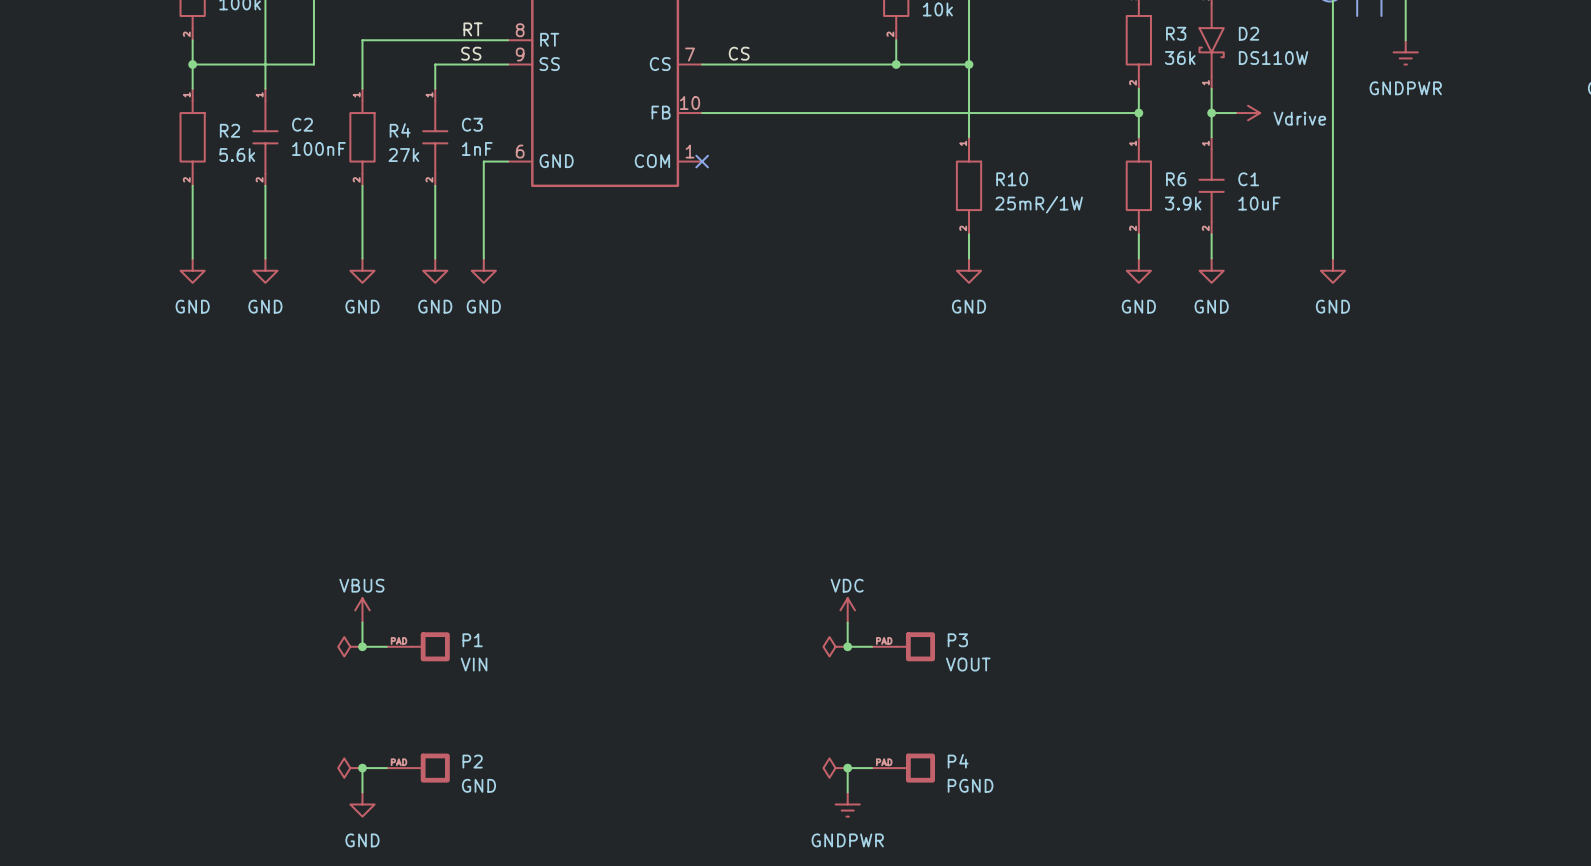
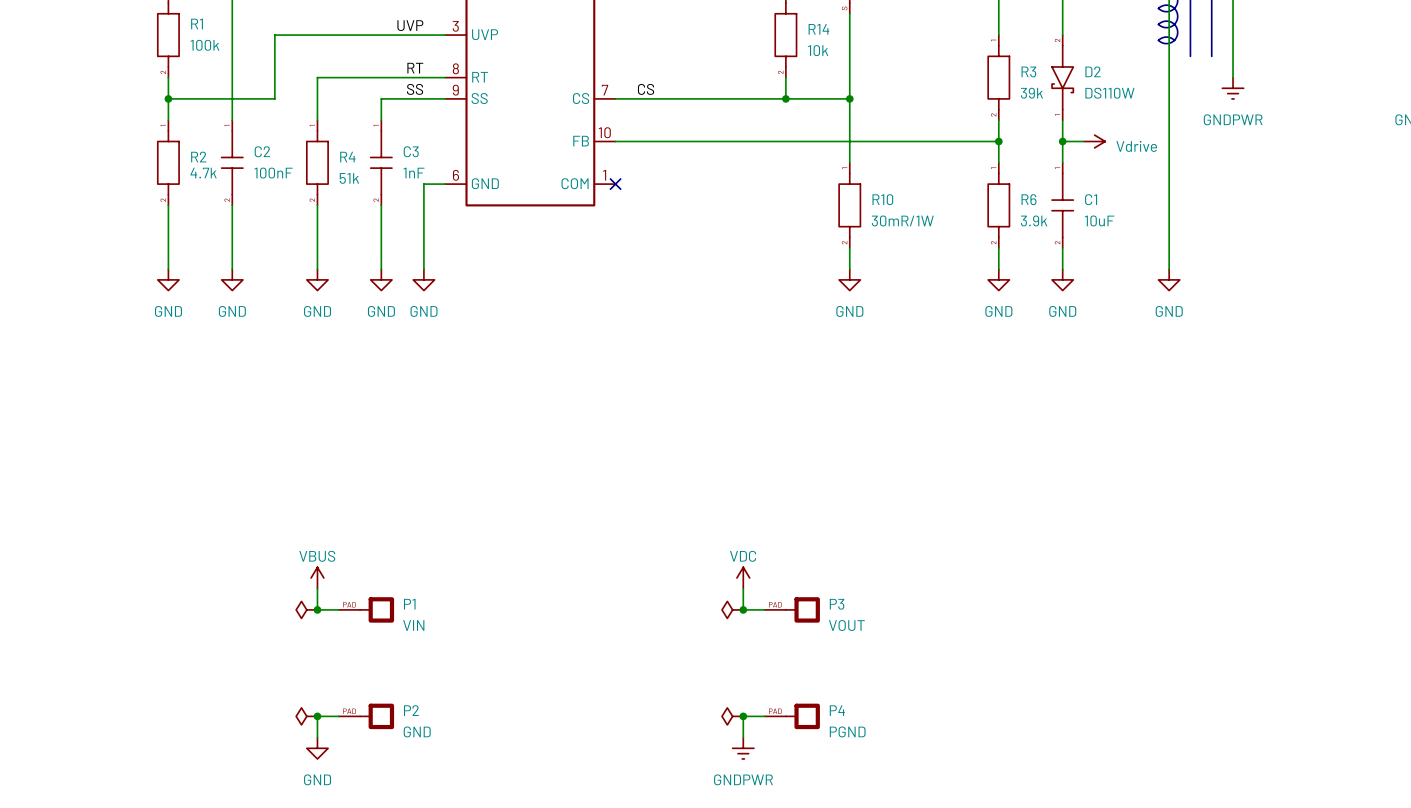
R3 value: 36k (1180, 57) -> 39k (1031, 93)
R2 value: 5.6k (237, 155) -> 4.7k (203, 173)
R4 value: 27k (403, 155) -> 51k (349, 178)
R10 value: 25mR/1W (1039, 204) -> 30mR/1W (902, 220)

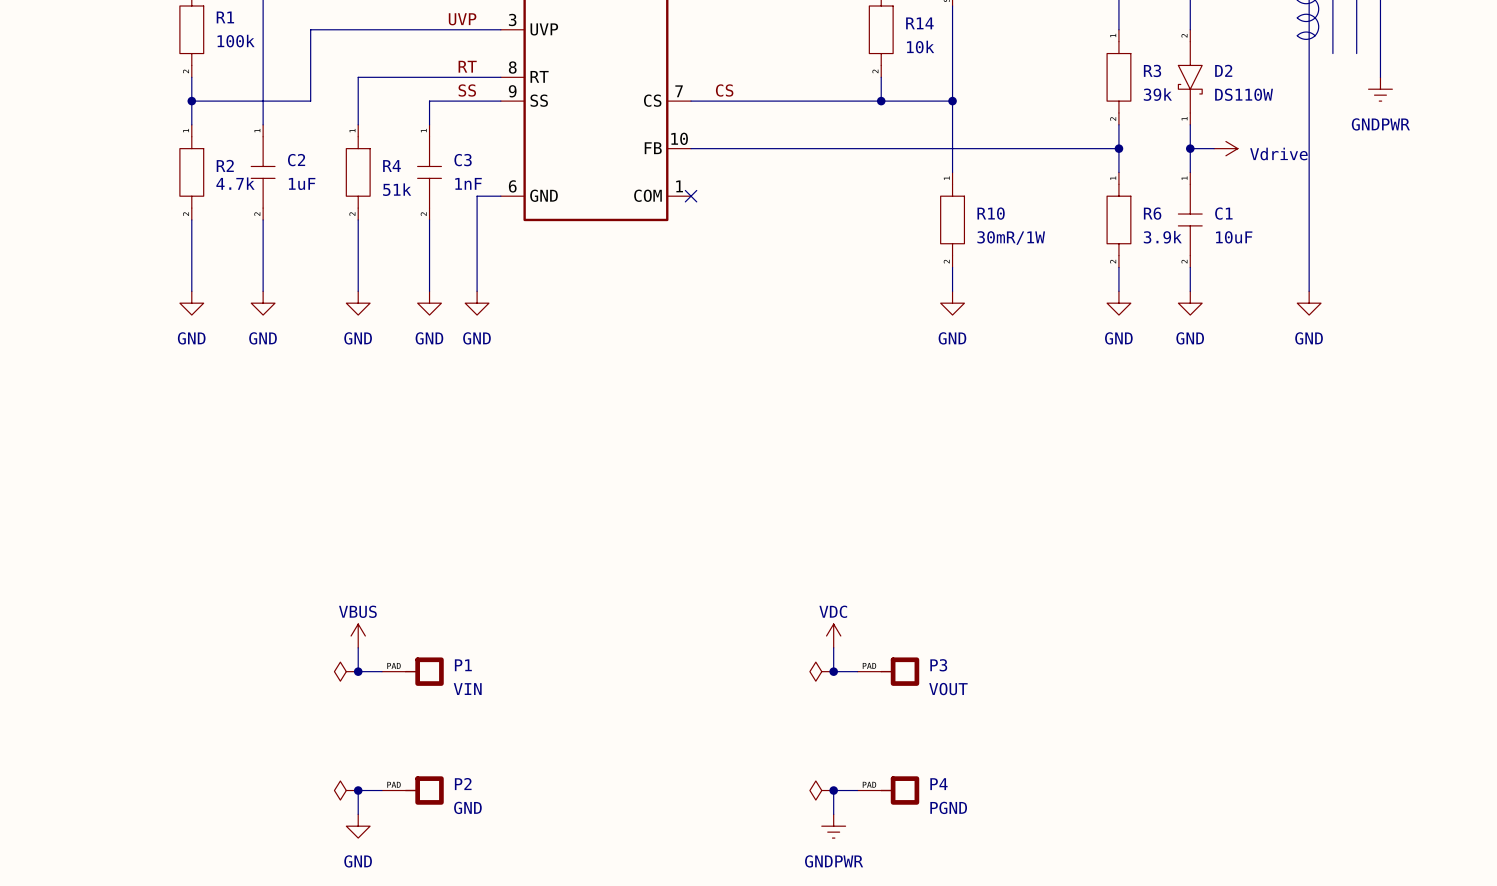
C2 value: 100nF (273, 173) -> 1uF (302, 183)

